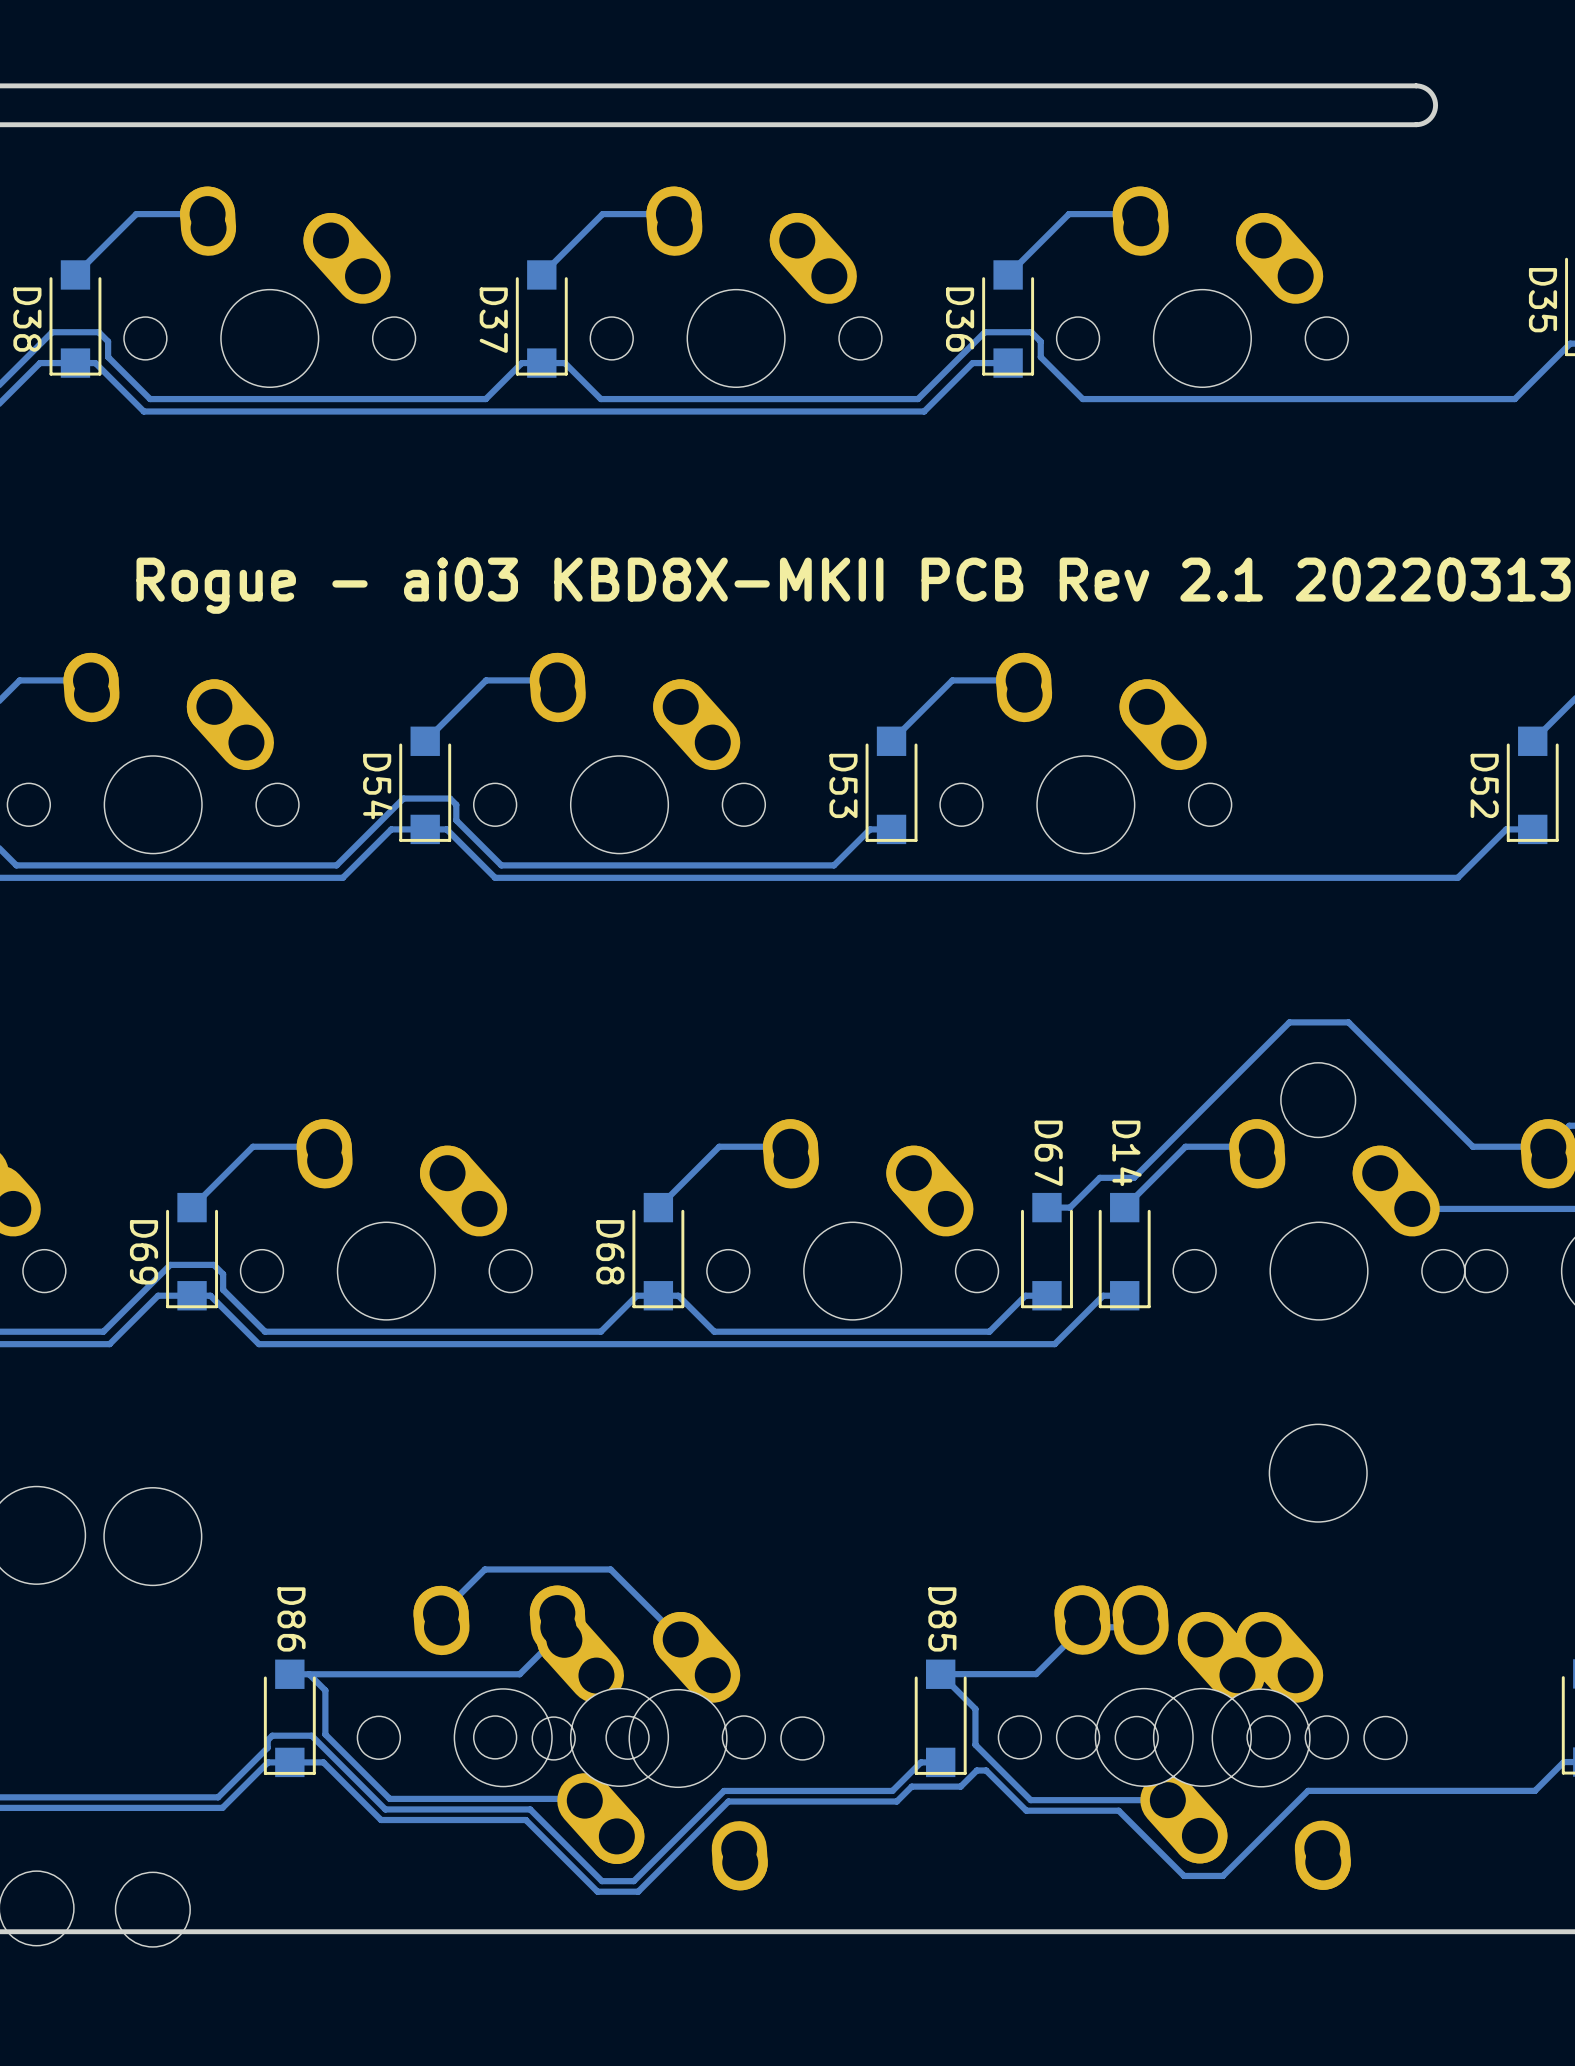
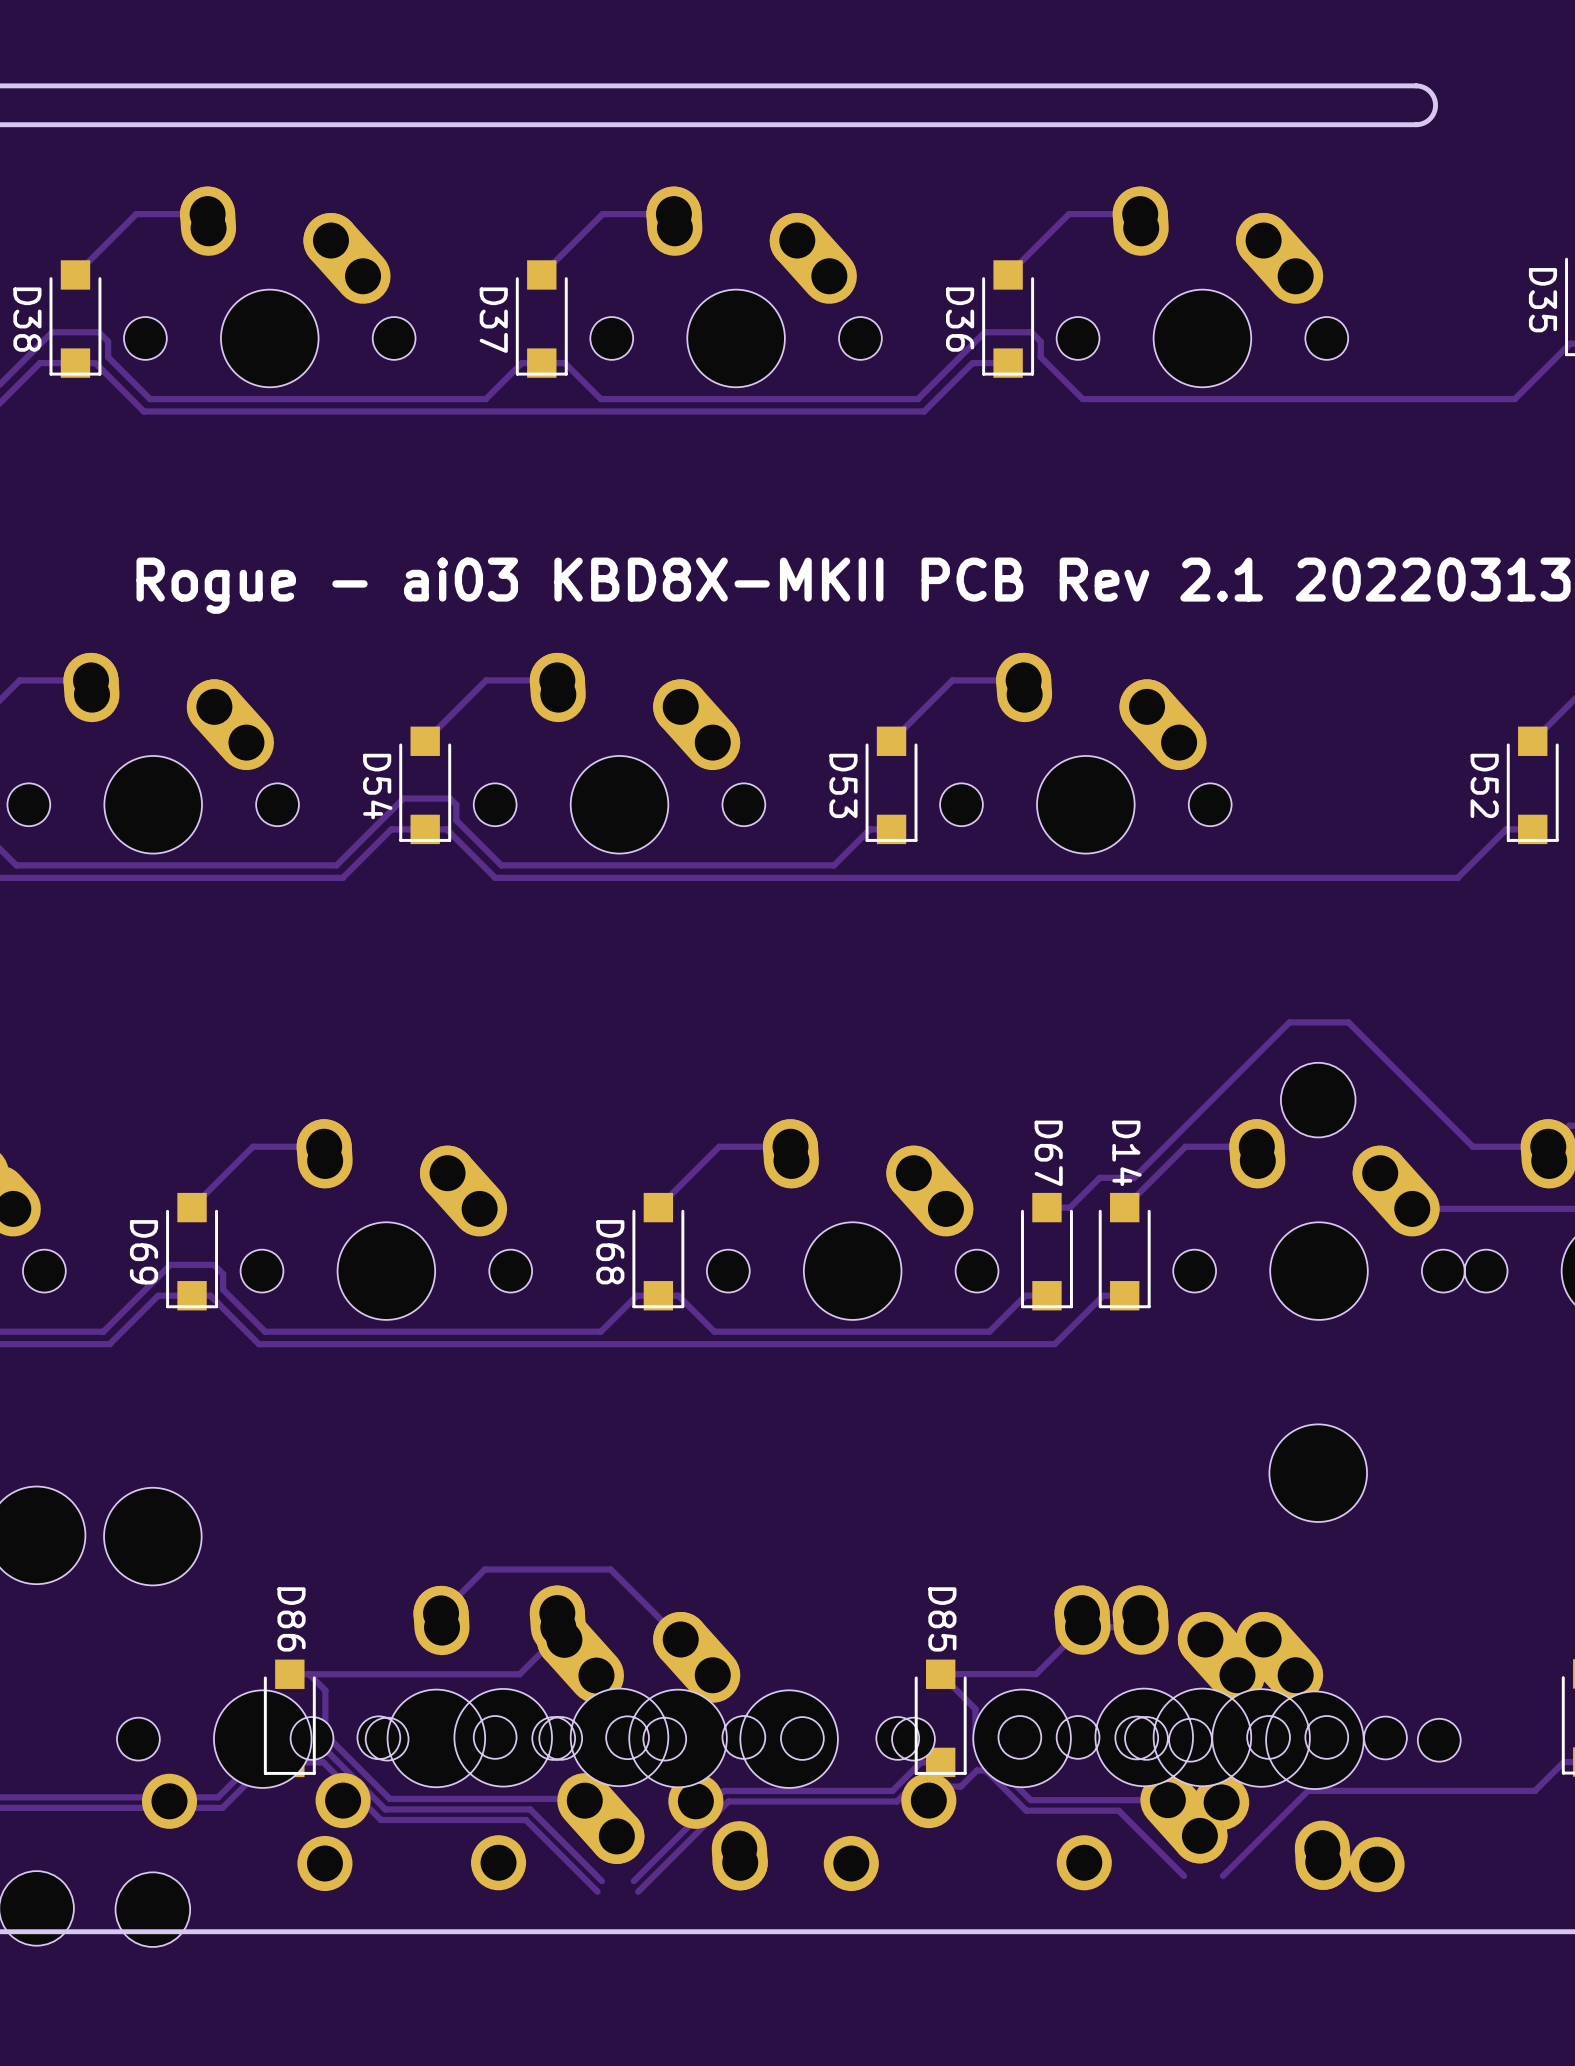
part: none -> (436, 1789)
part: none -> (1022, 1789)
part: none -> (262, 1790)
part: none -> (789, 1790)
part: none -> (1314, 1791)
track: (1222, 1875) (1183, 1875) -> none
track: (633, 1881) (601, 1881) -> none
track: (638, 1891) (597, 1891) -> none

